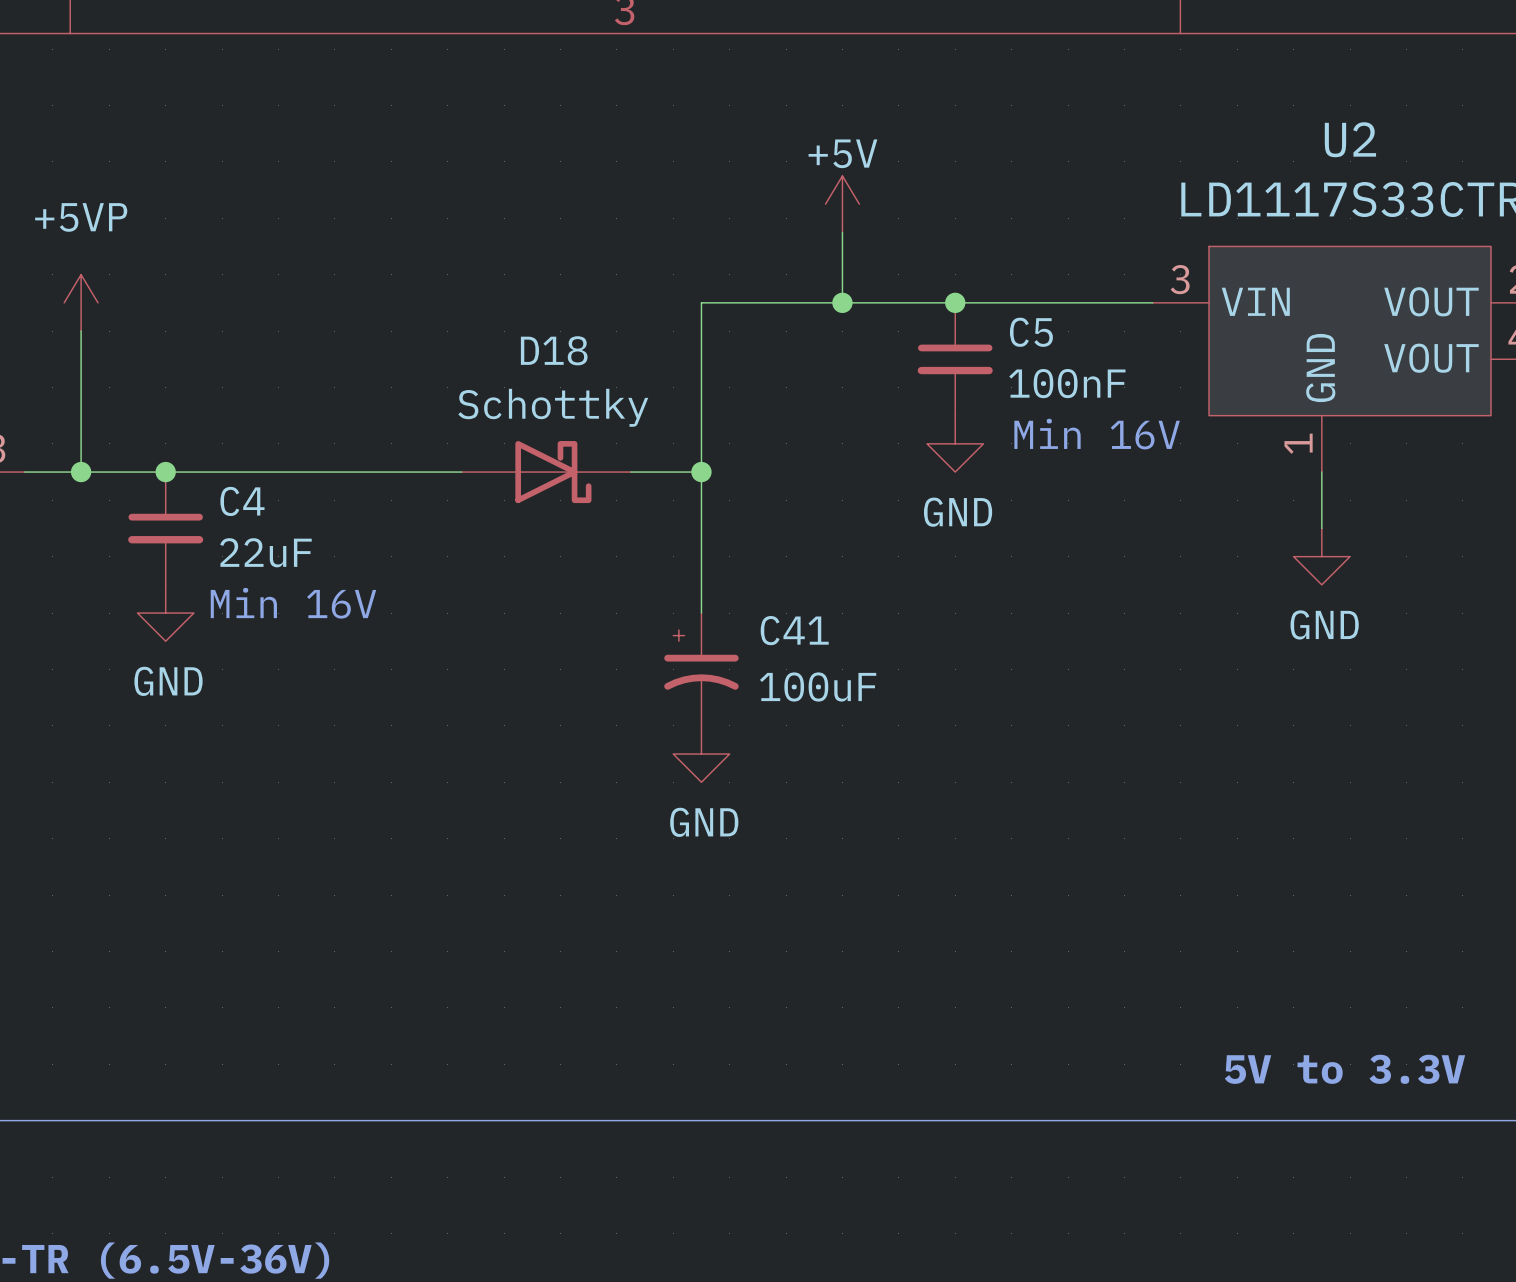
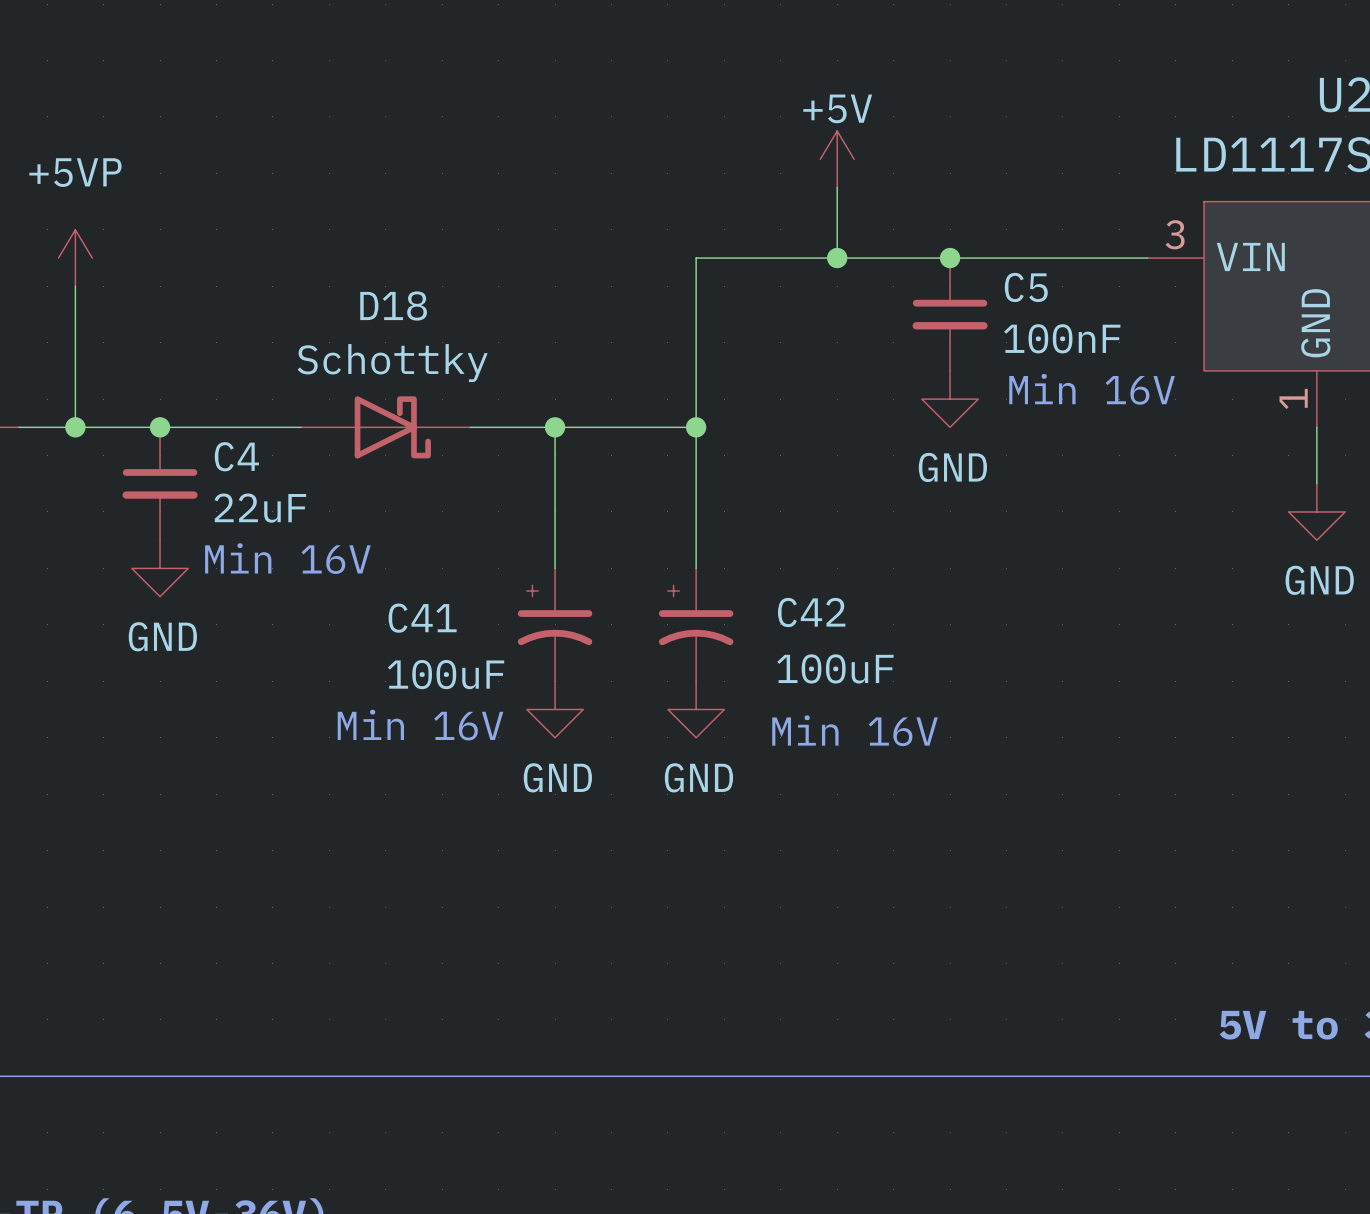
D18 position: (546, 472) -> (385, 427)
wire: none -> (555, 427) (555, 568)
junction: none -> (555, 427)
C41 name: C41 (794, 630) -> C42 (811, 612)
C41: none -> 100uF (555, 624)
C41 value position: 100uF (818, 686) -> 100uF (835, 668)
power symbol: none -> GND (555, 709)
text: none -> Min 16V (420, 725)
text: none -> Min 16V (855, 730)

